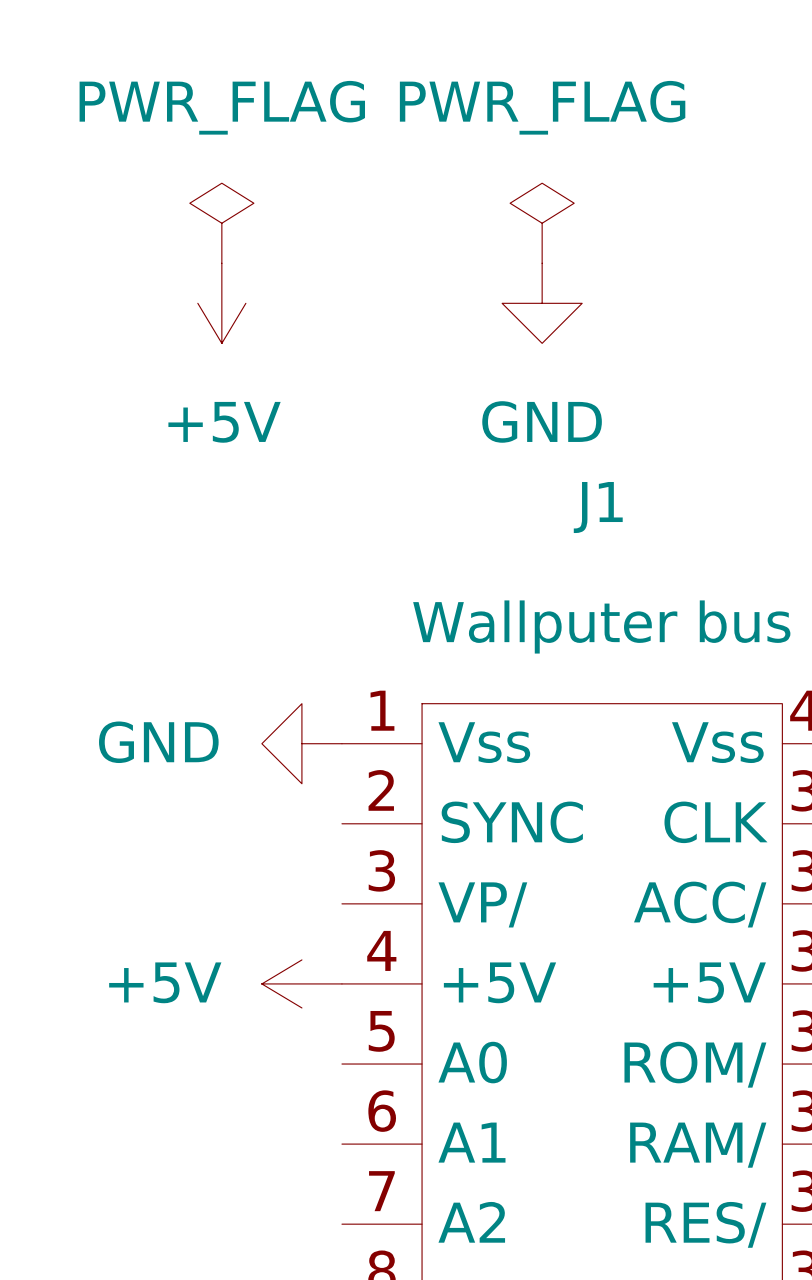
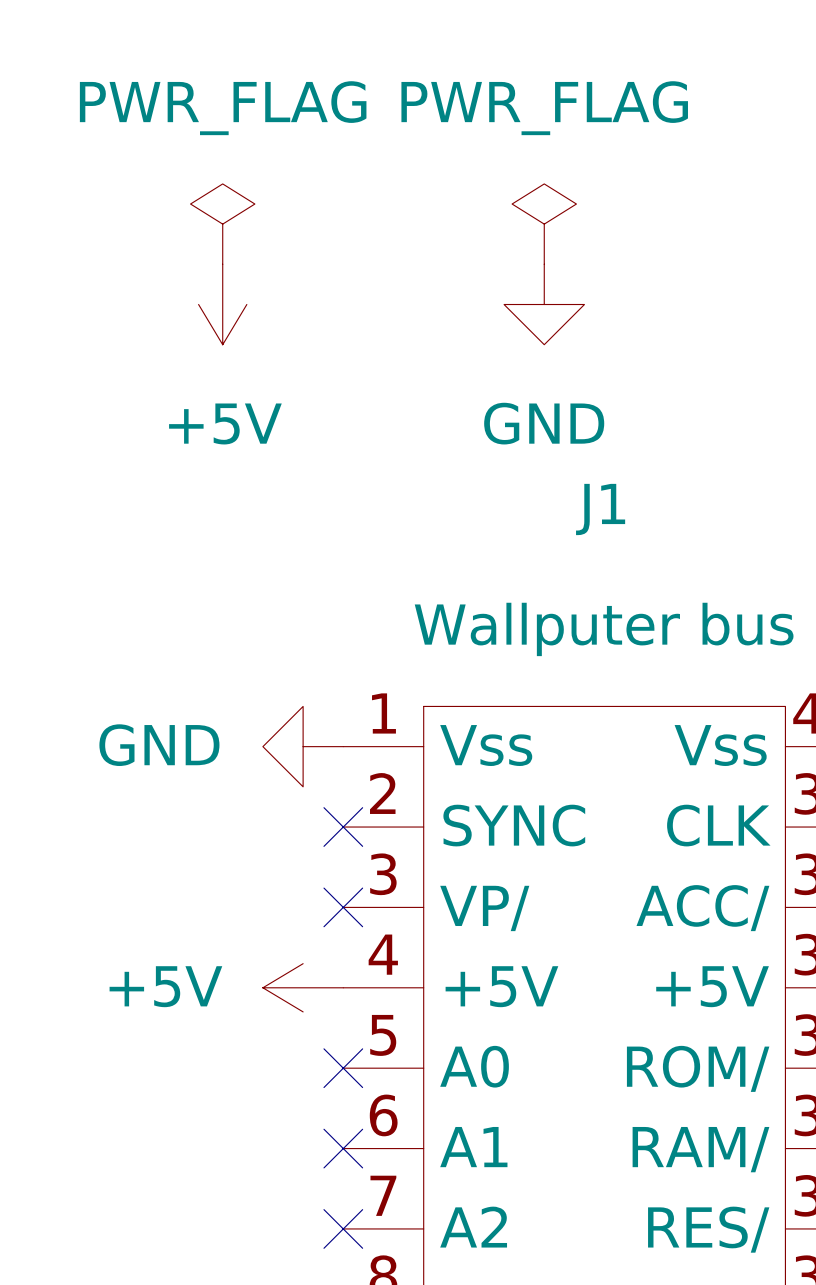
no-connect mark: none -> (343, 827)
no-connect mark: none -> (343, 907)
no-connect mark: none -> (343, 1068)
no-connect mark: none -> (343, 1148)
no-connect mark: none -> (343, 1228)

